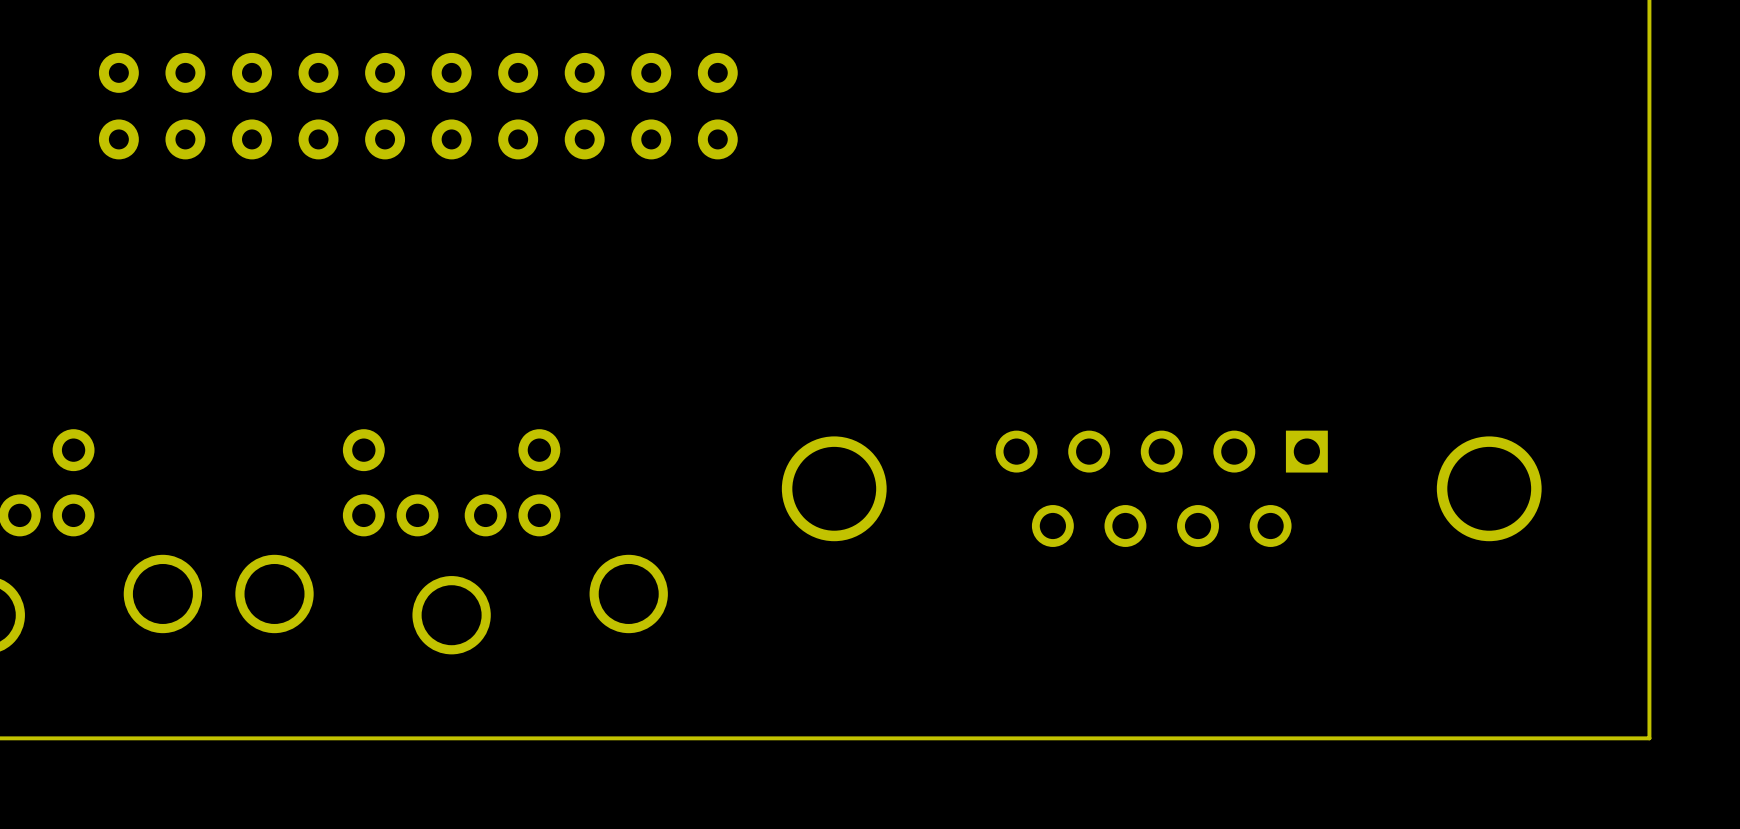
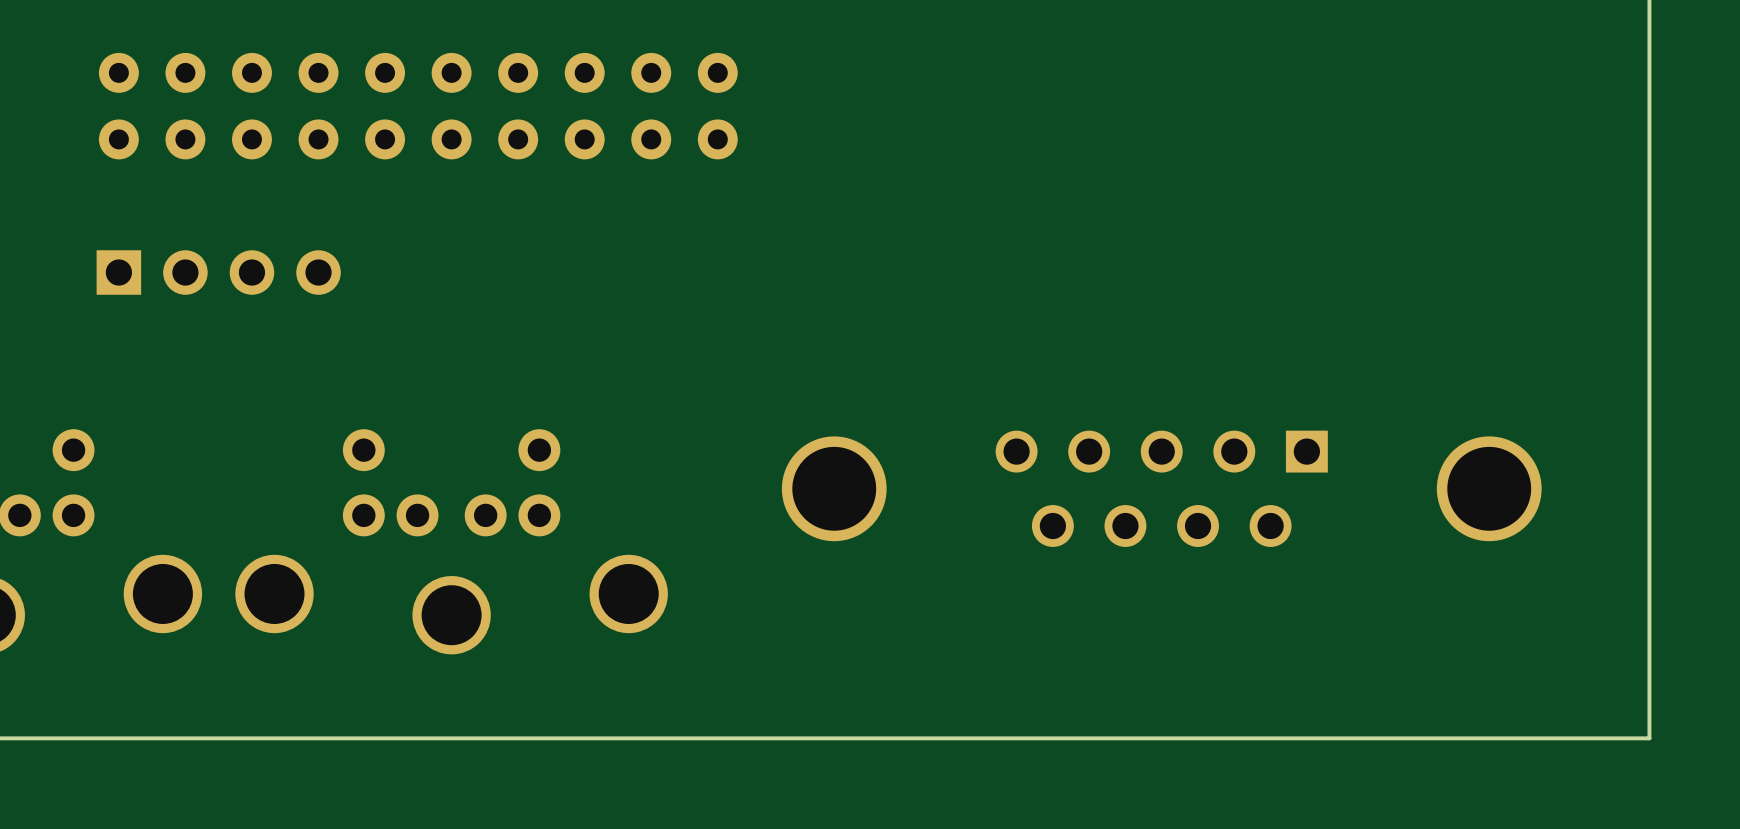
part: none -> (218, 272)

